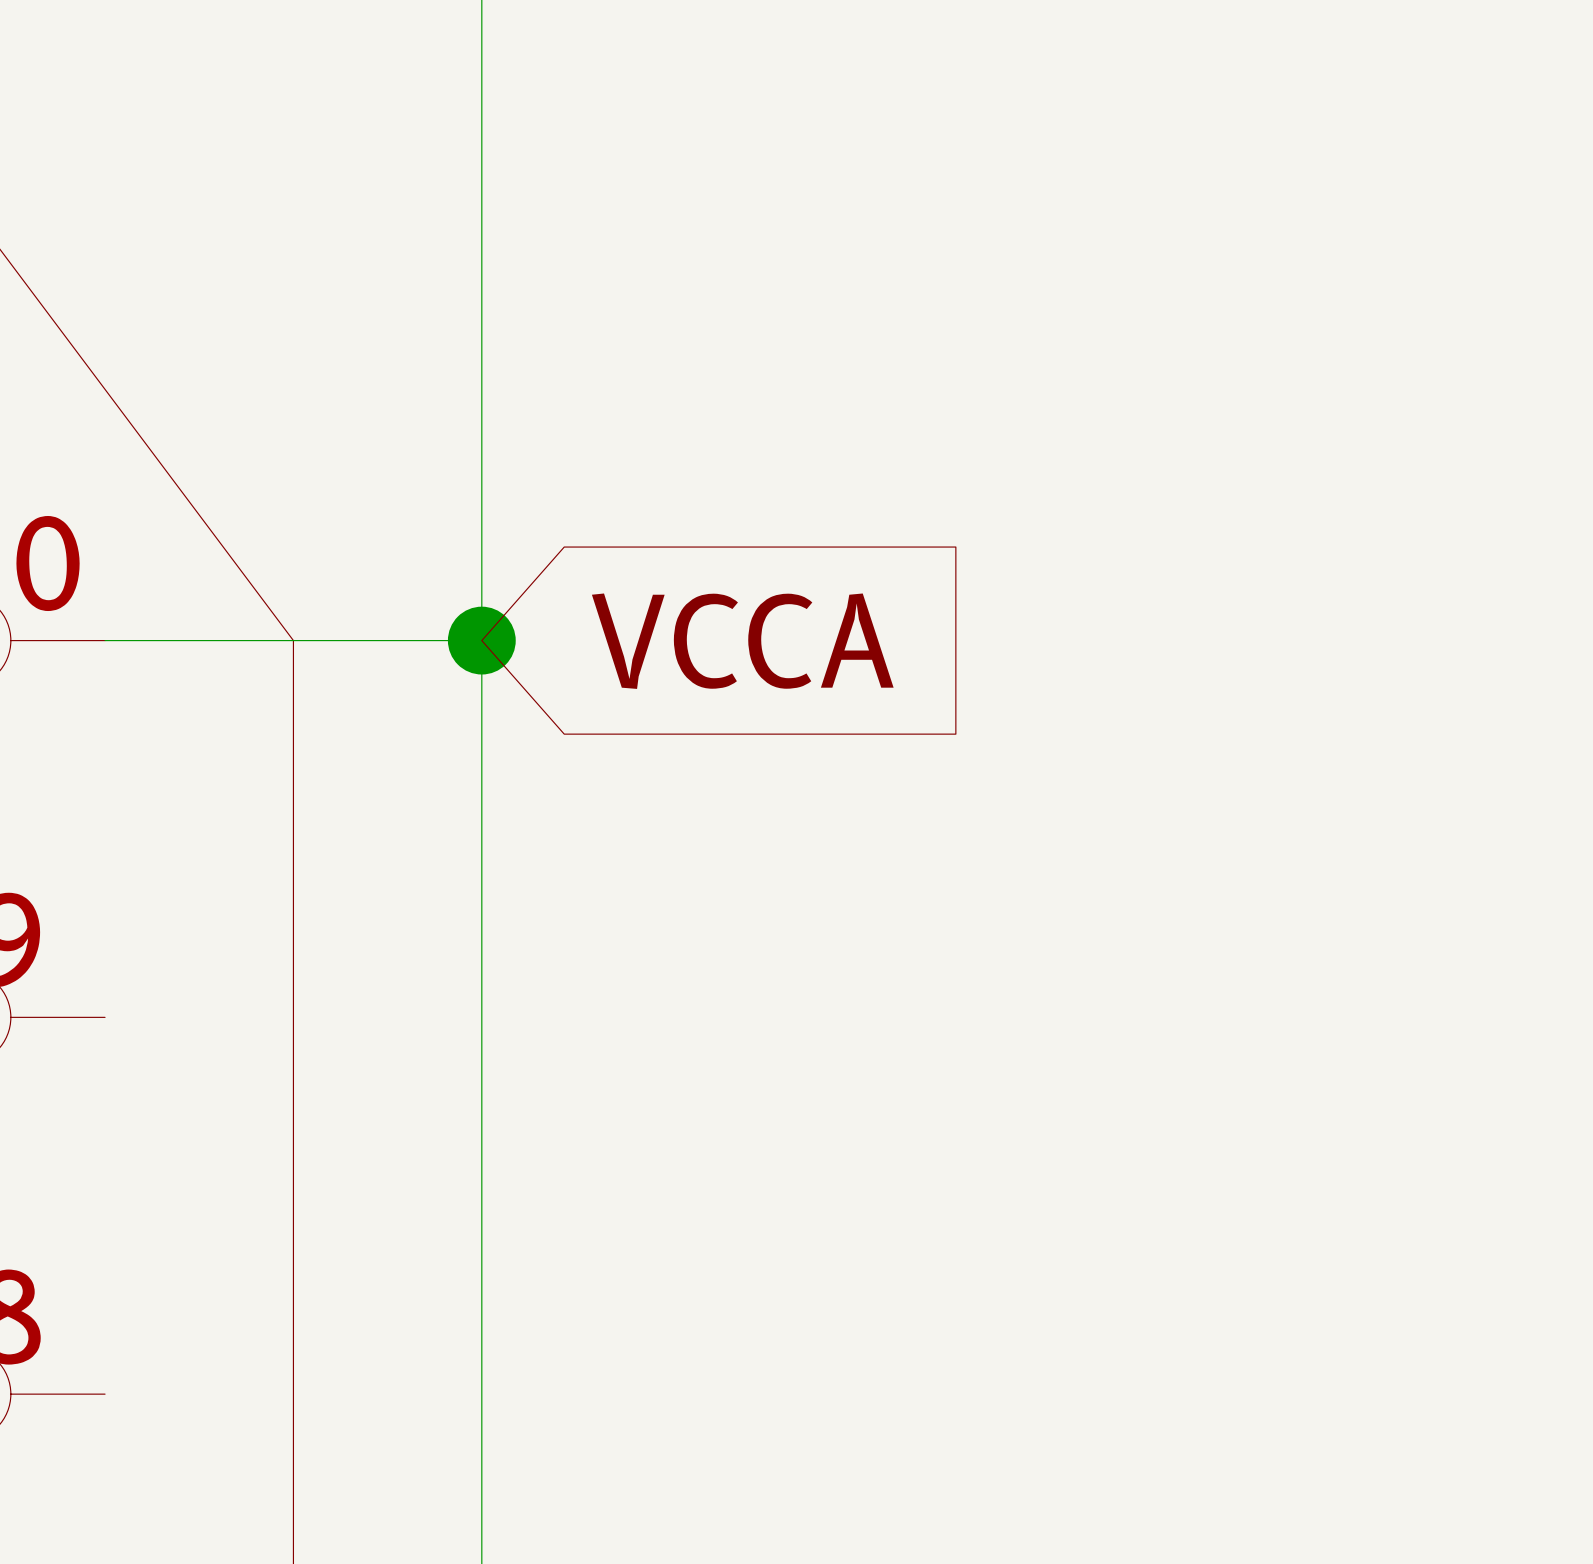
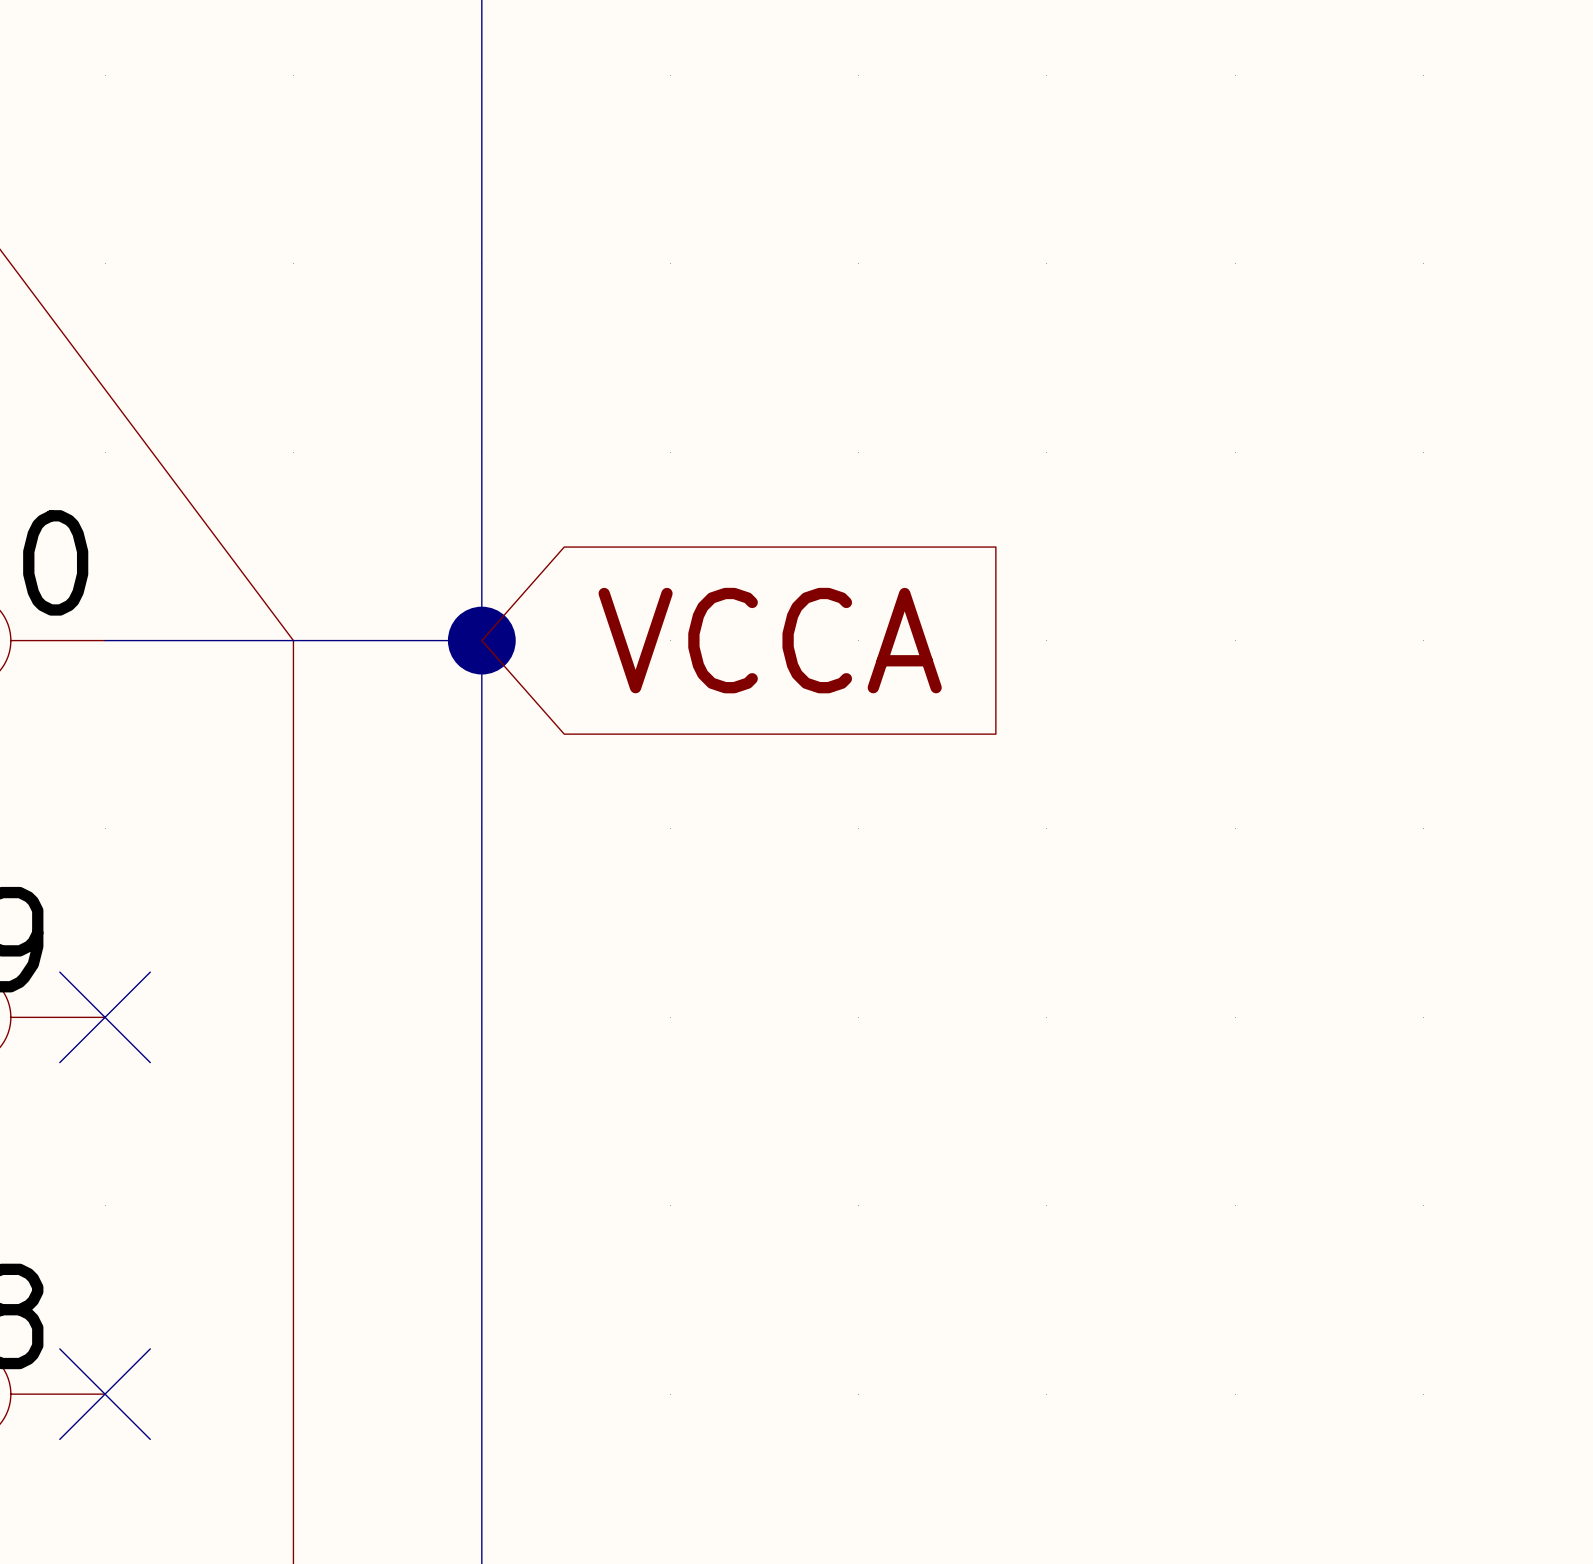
no-connect mark: none -> (105, 1017)
no-connect mark: none -> (105, 1394)

